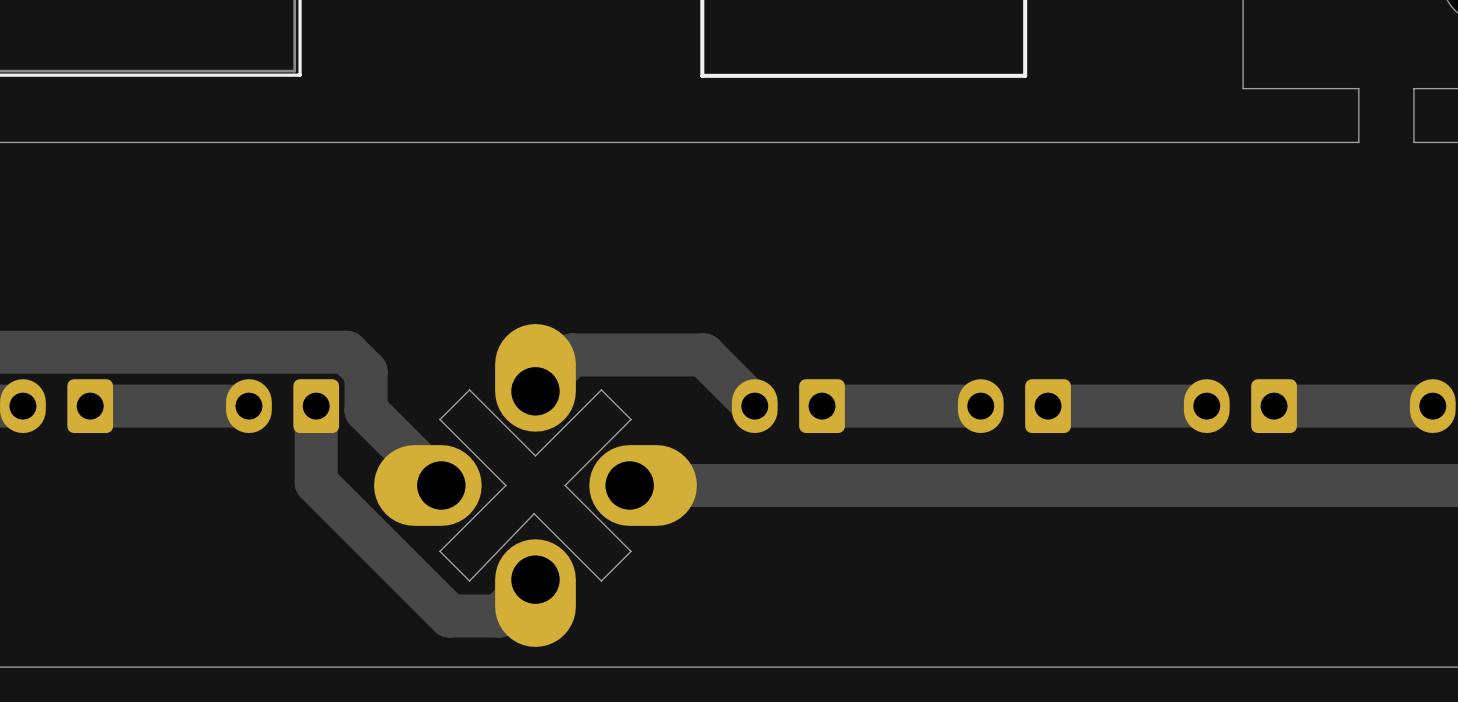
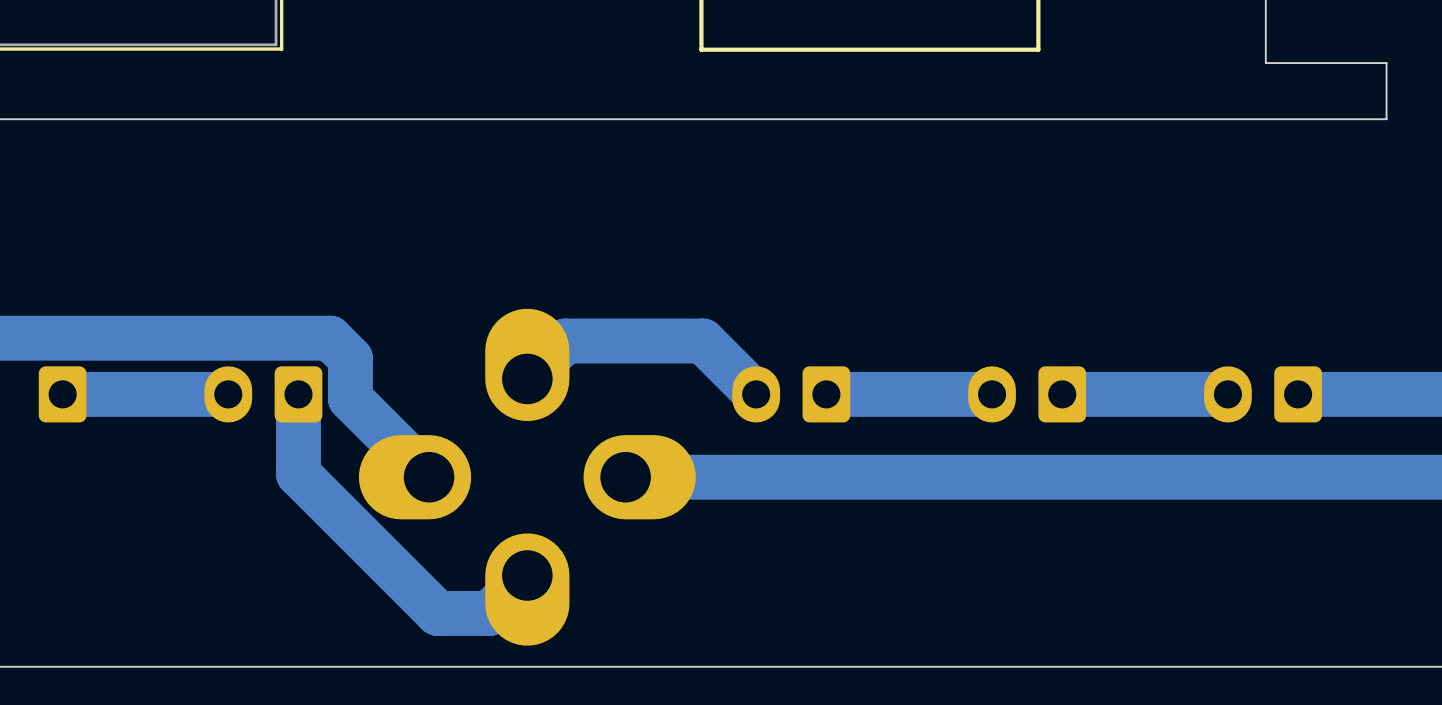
part footprint: [374, 324, 697, 647] -> [358, 308, 696, 646]

